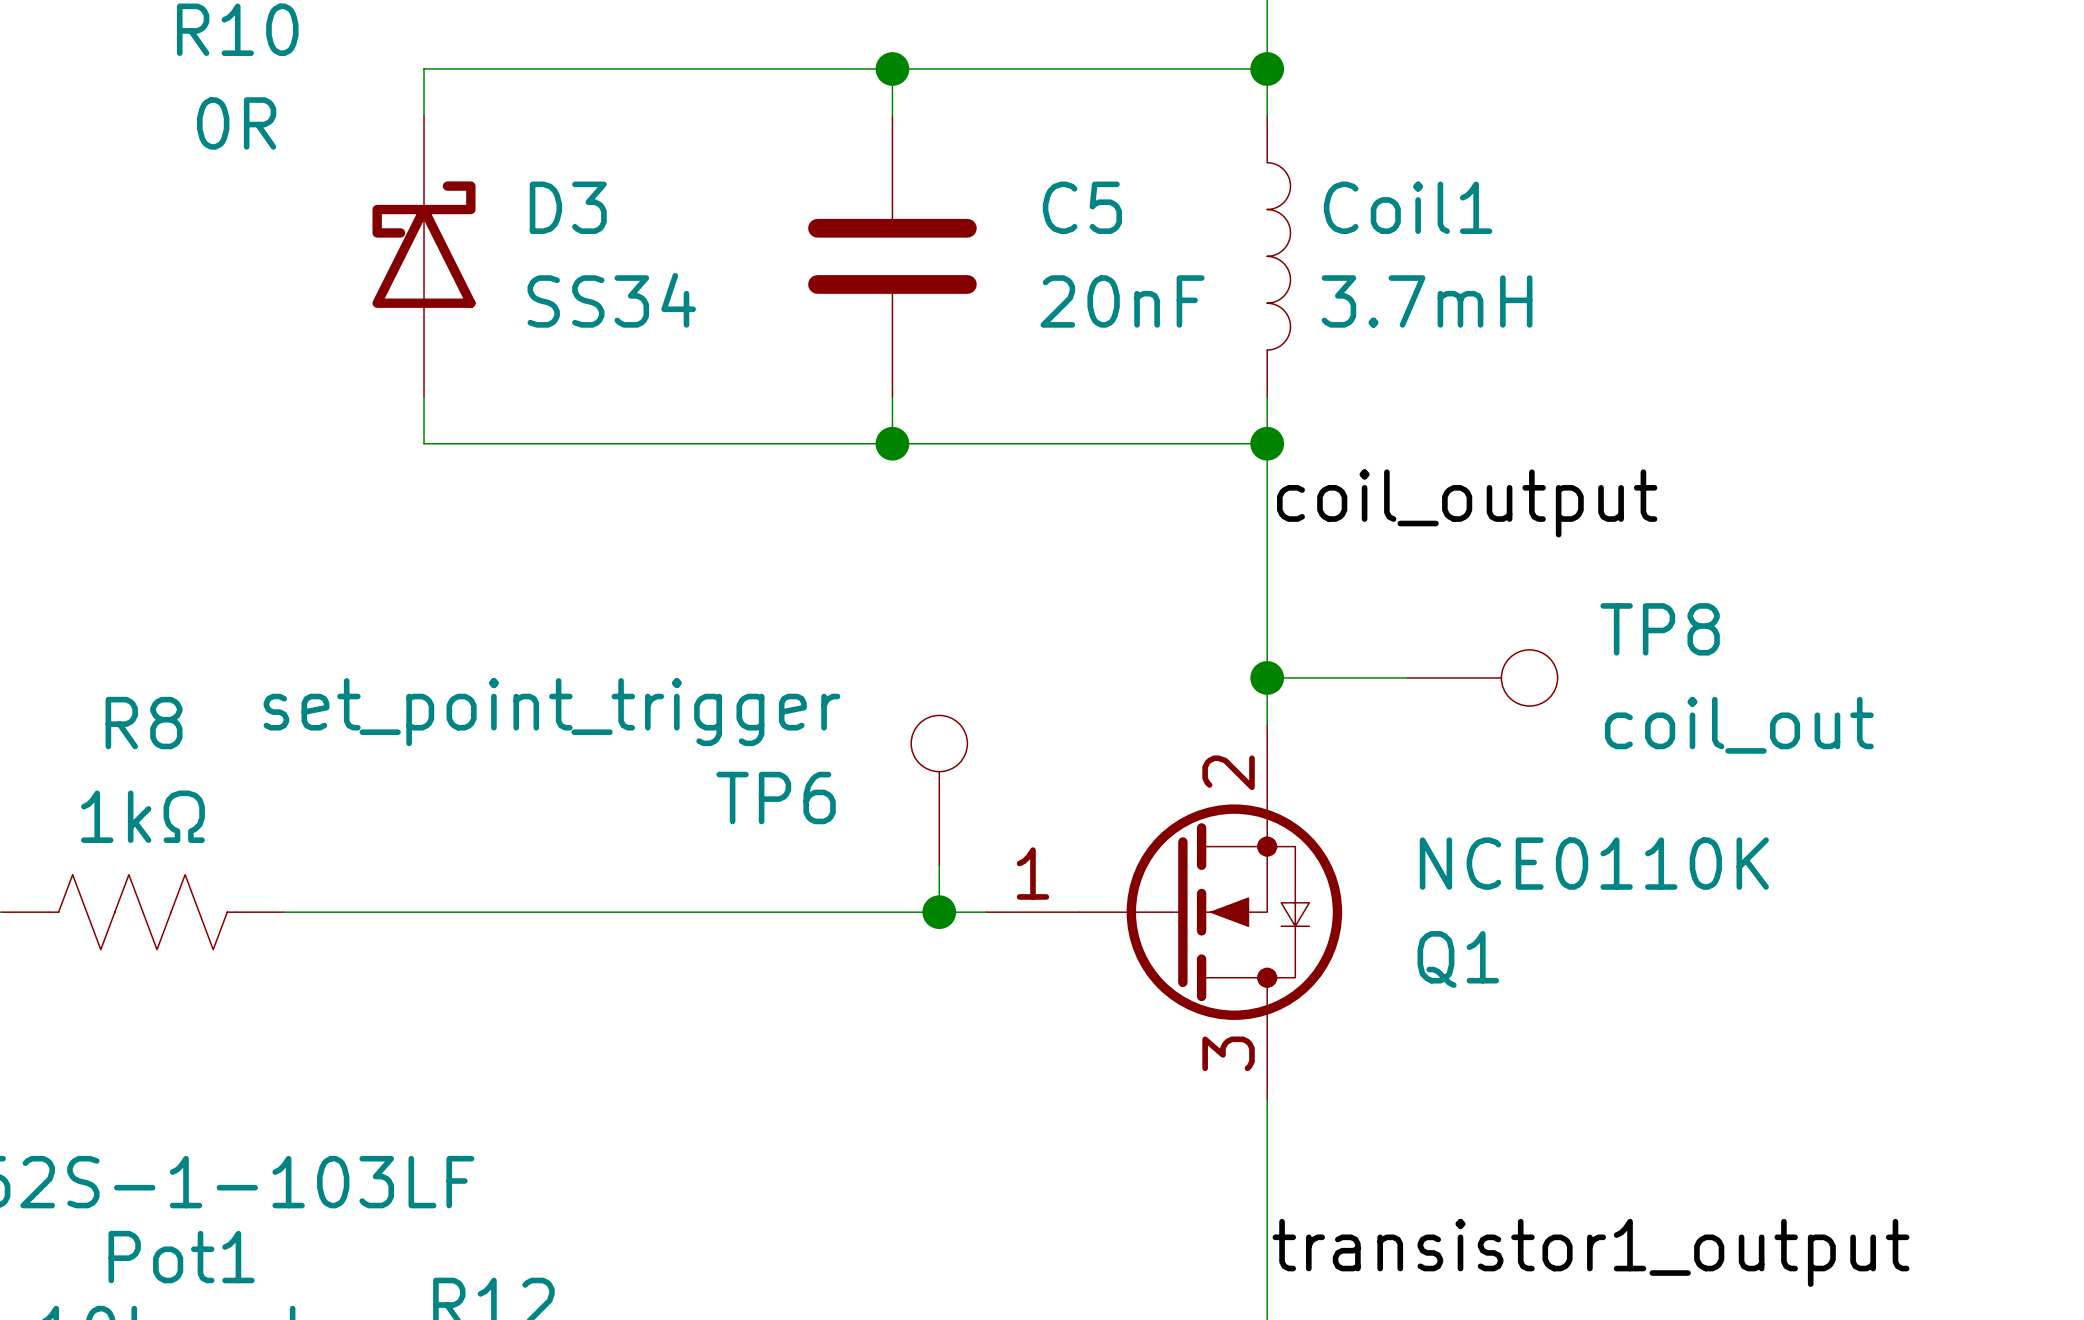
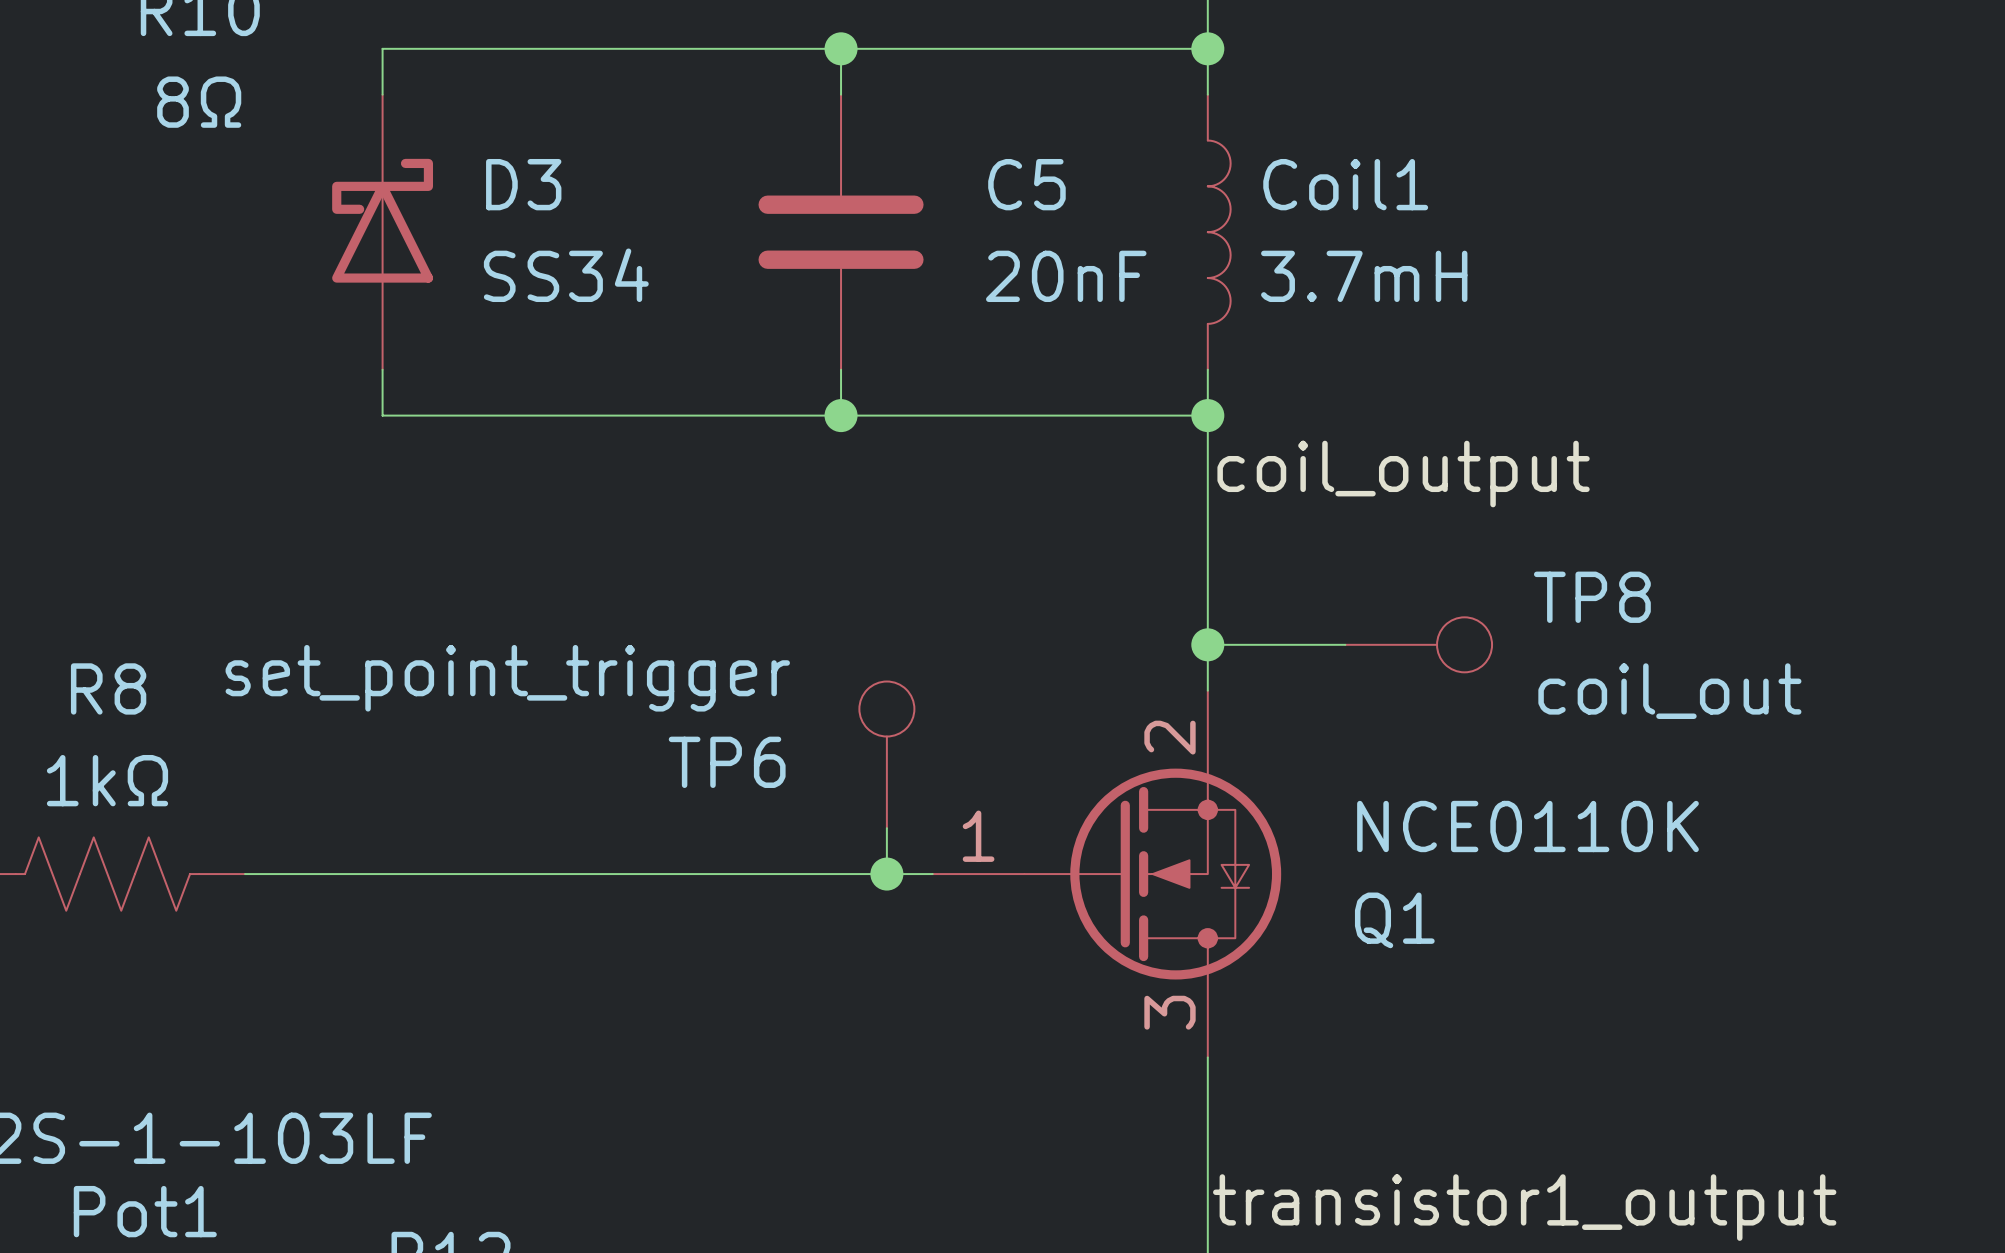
R10 value: 0R (236, 123) -> 8Ω (199, 102)

